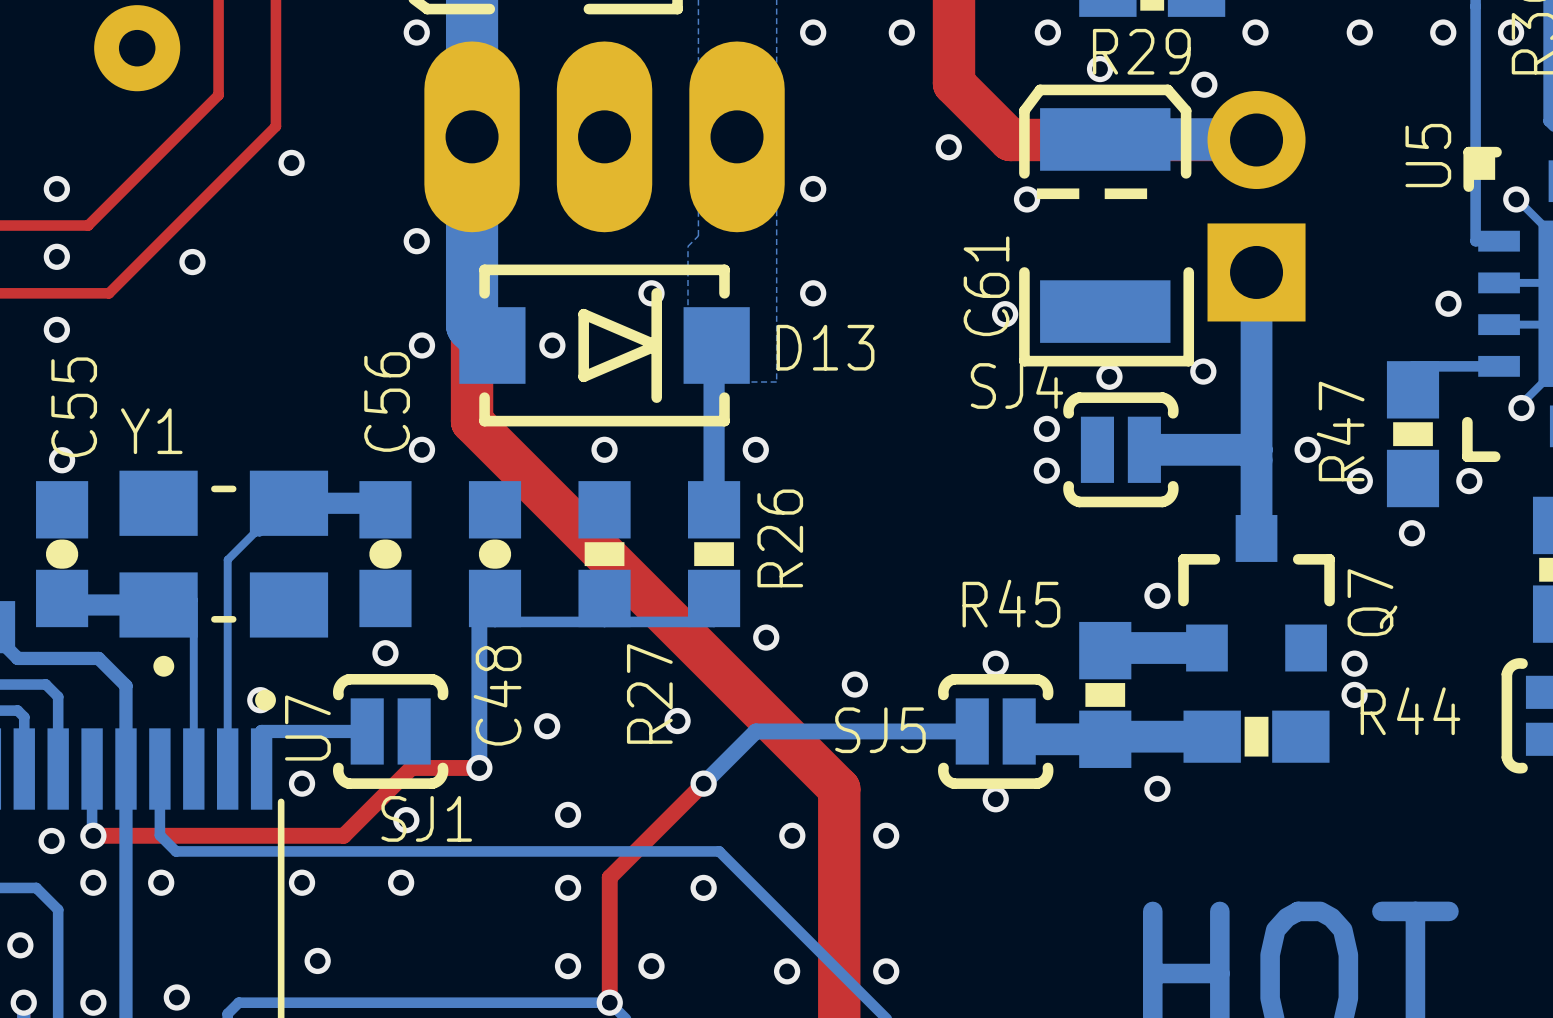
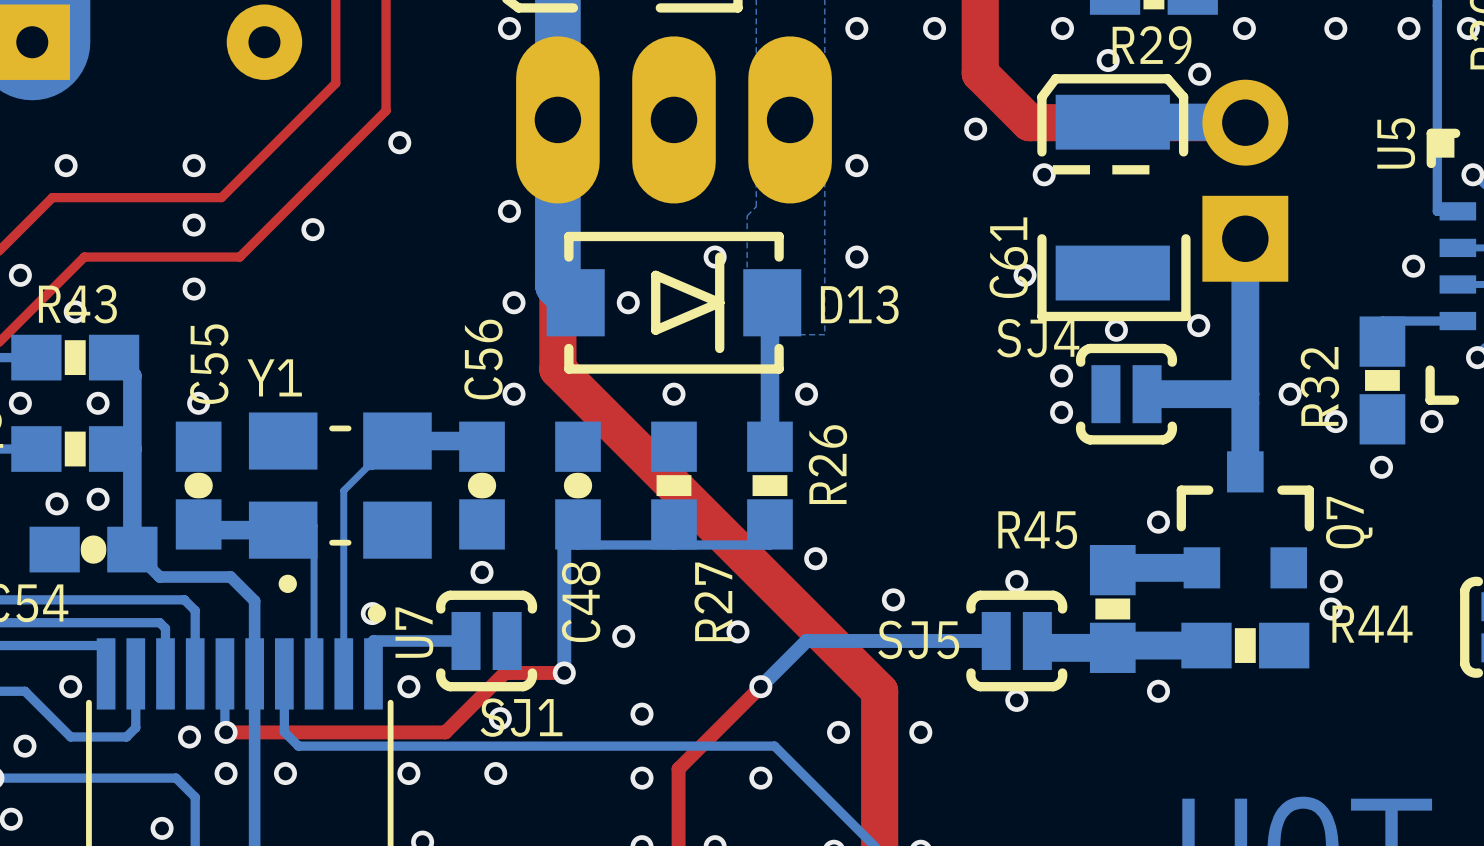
R47 name: R47 (1340, 431) -> R32 (1319, 386)

